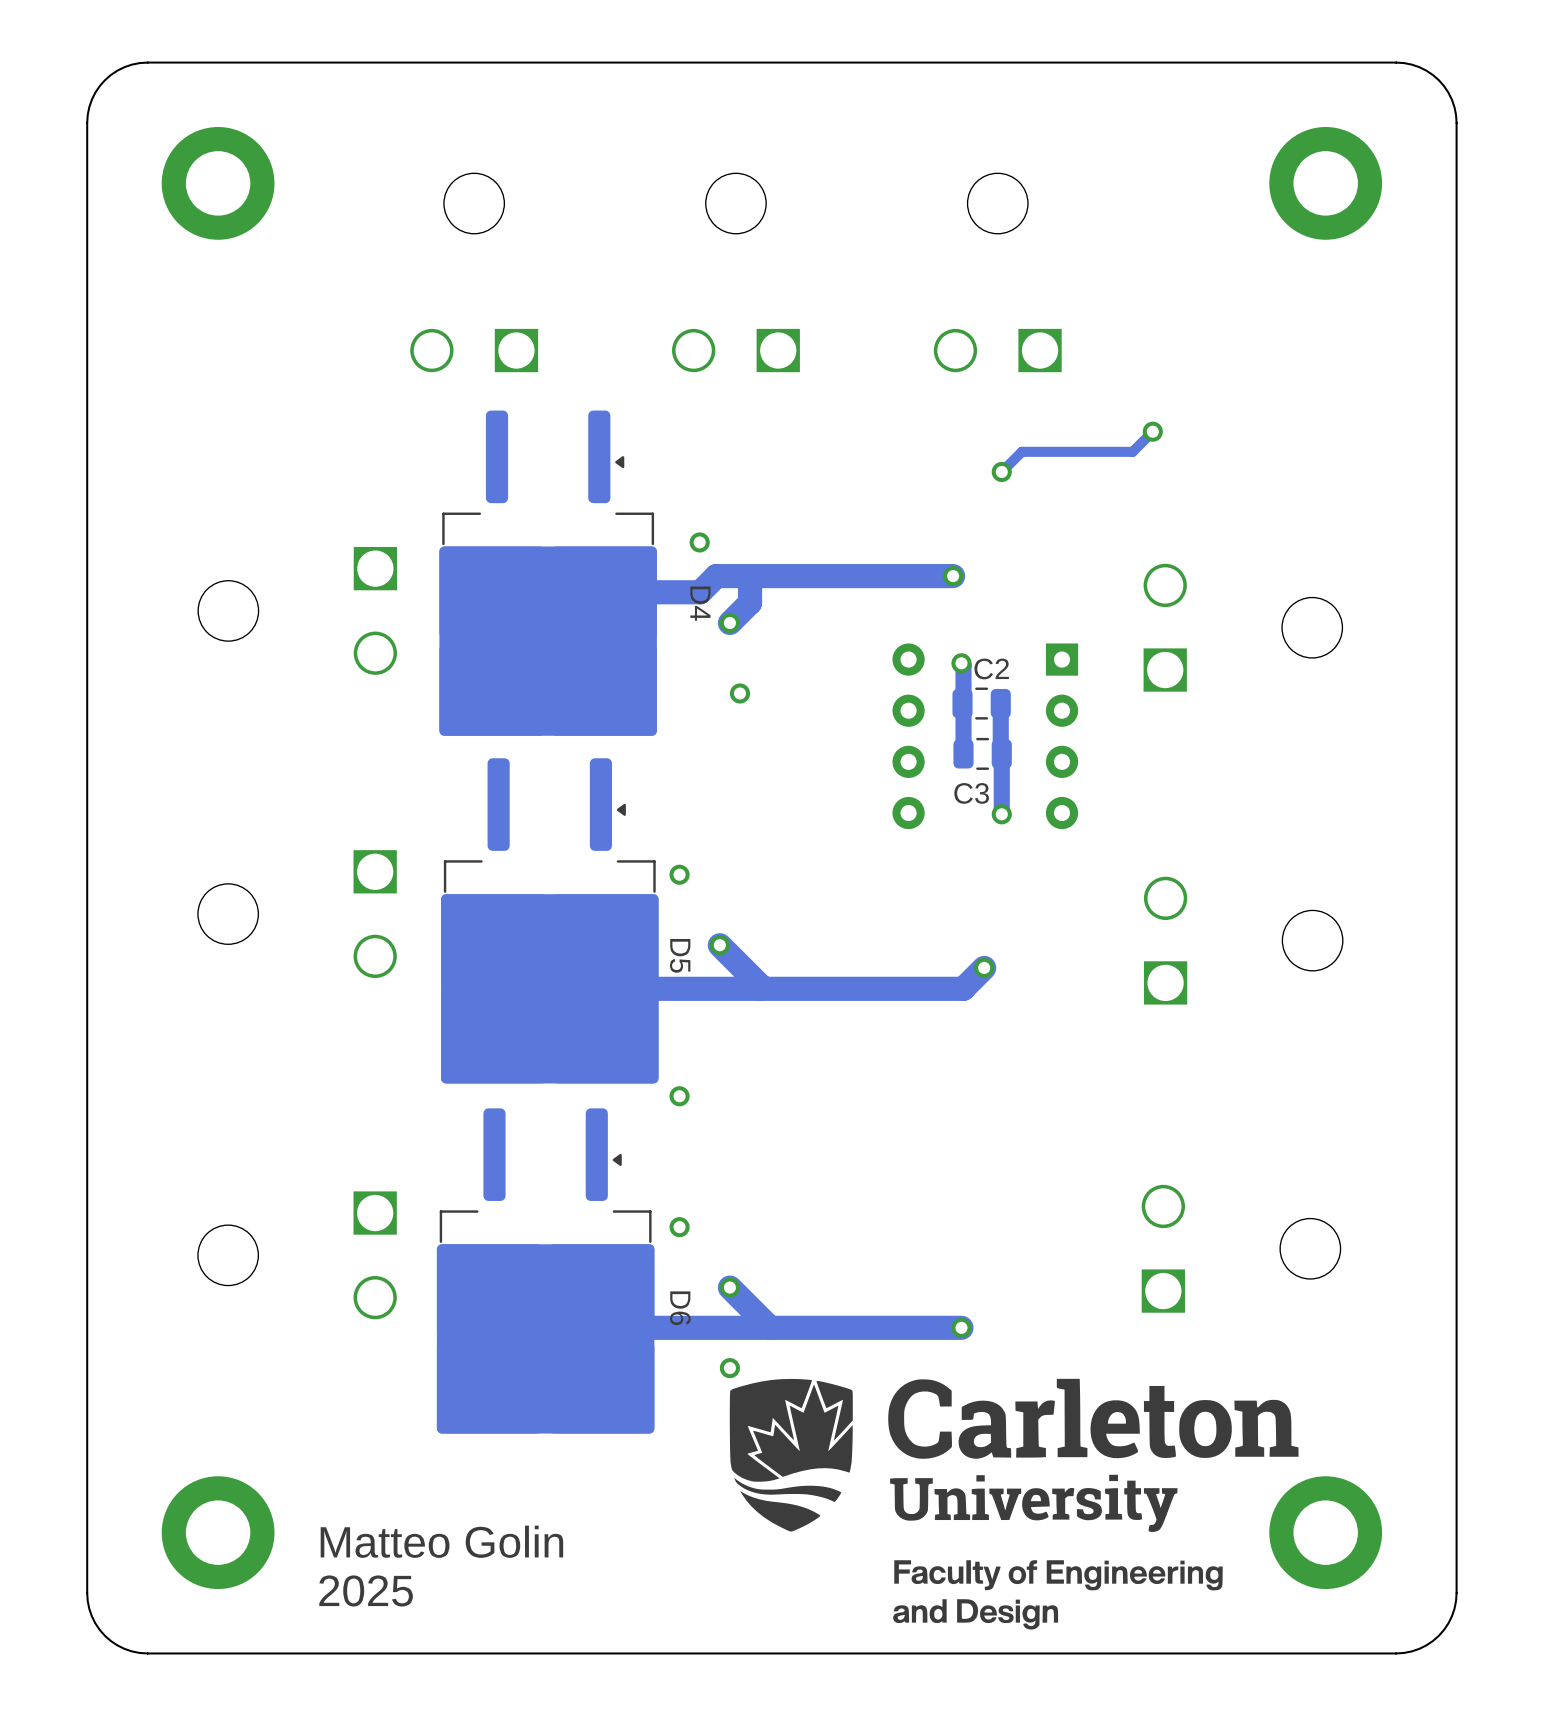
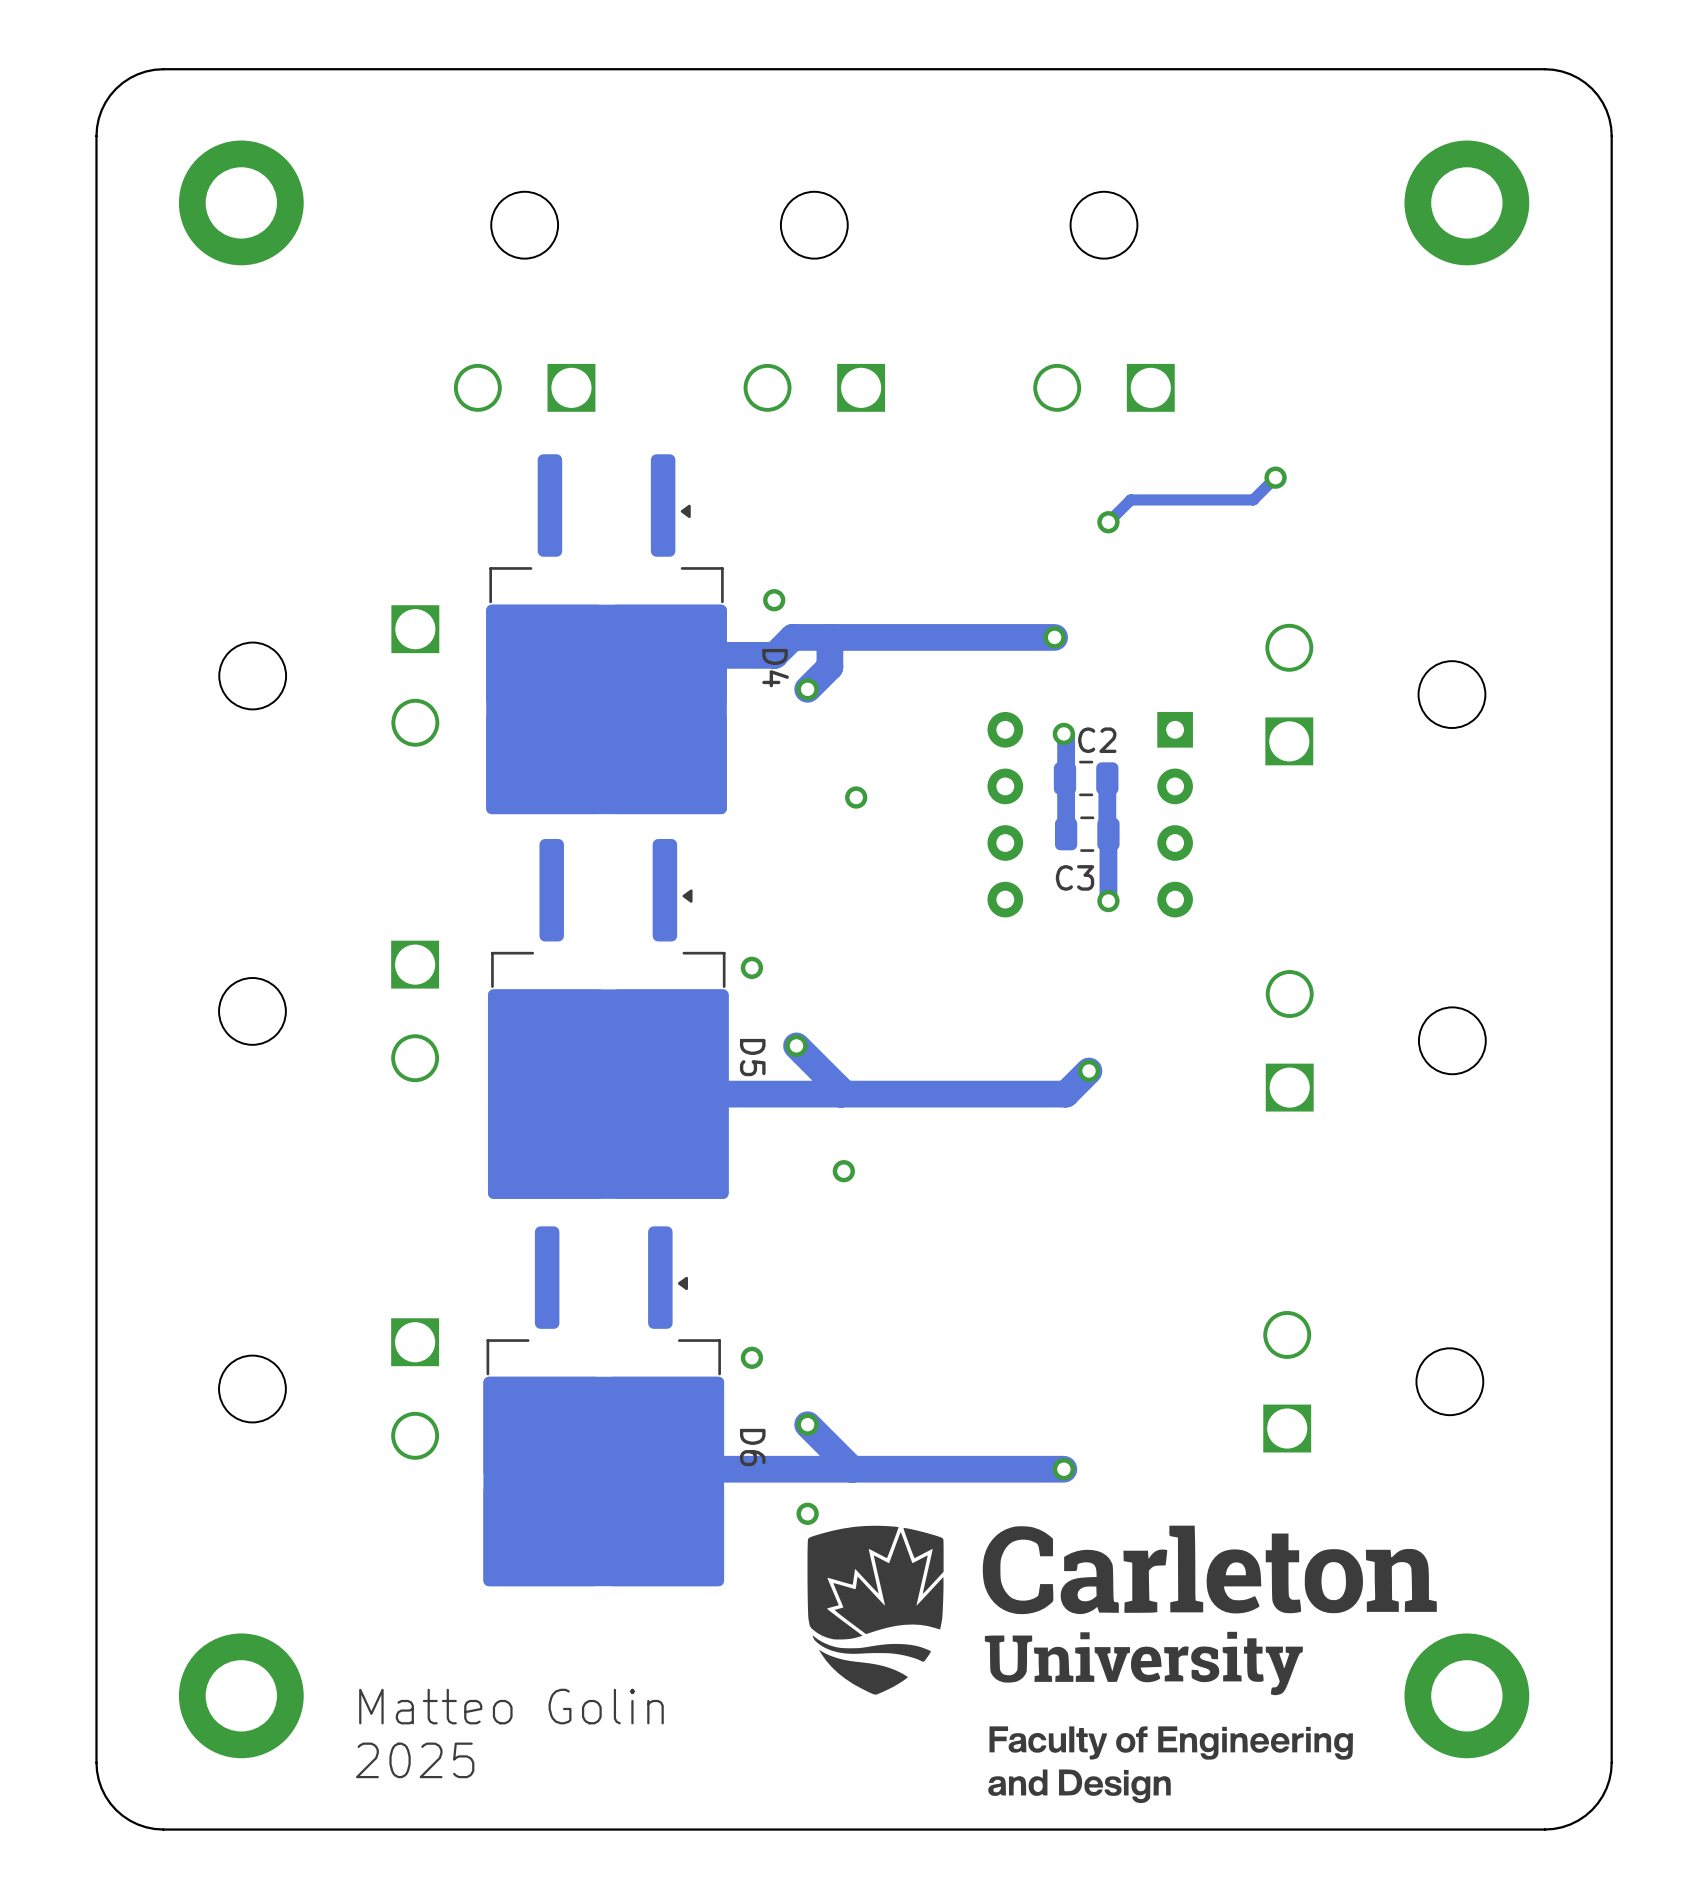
via position: (739, 693) -> (856, 797)
via position: (679, 1096) -> (843, 1171)

